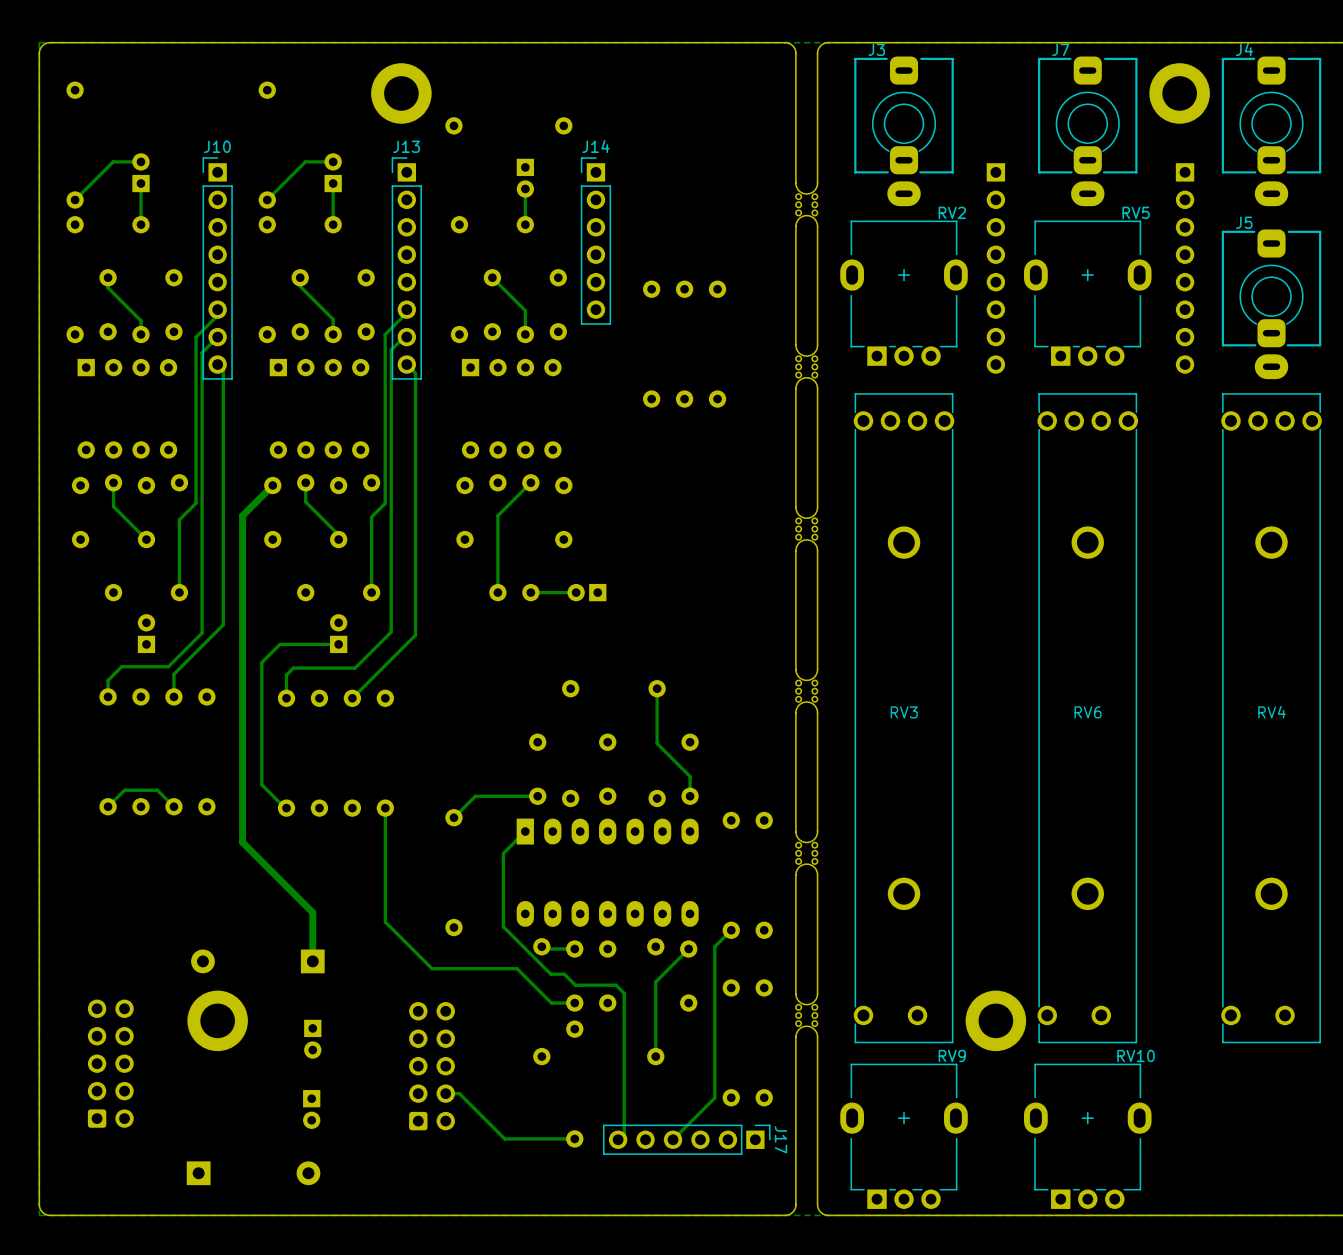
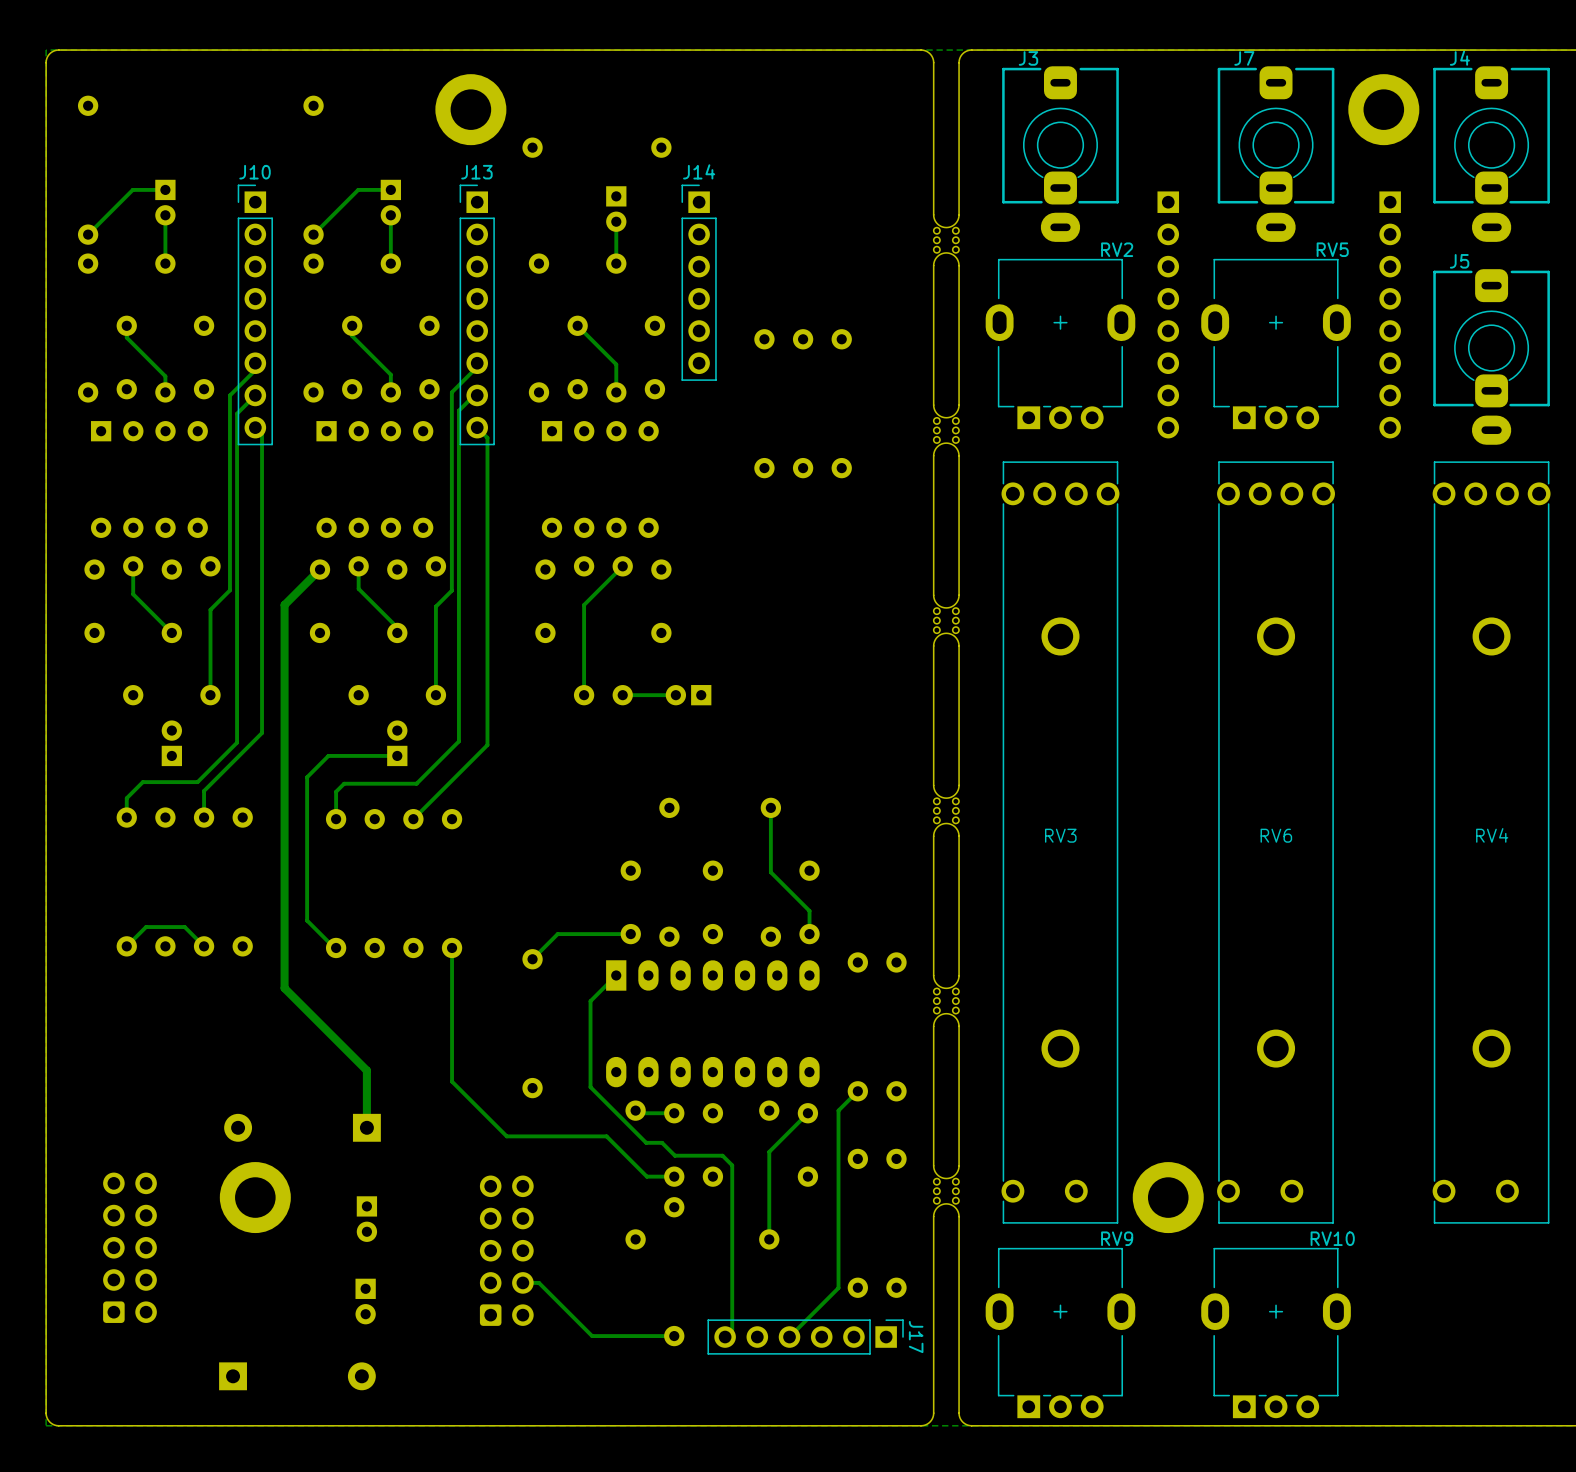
part rotation: 0° (141, 172) -> 180° (165, 202)
part rotation: 0° (333, 172) -> 180° (390, 202)

